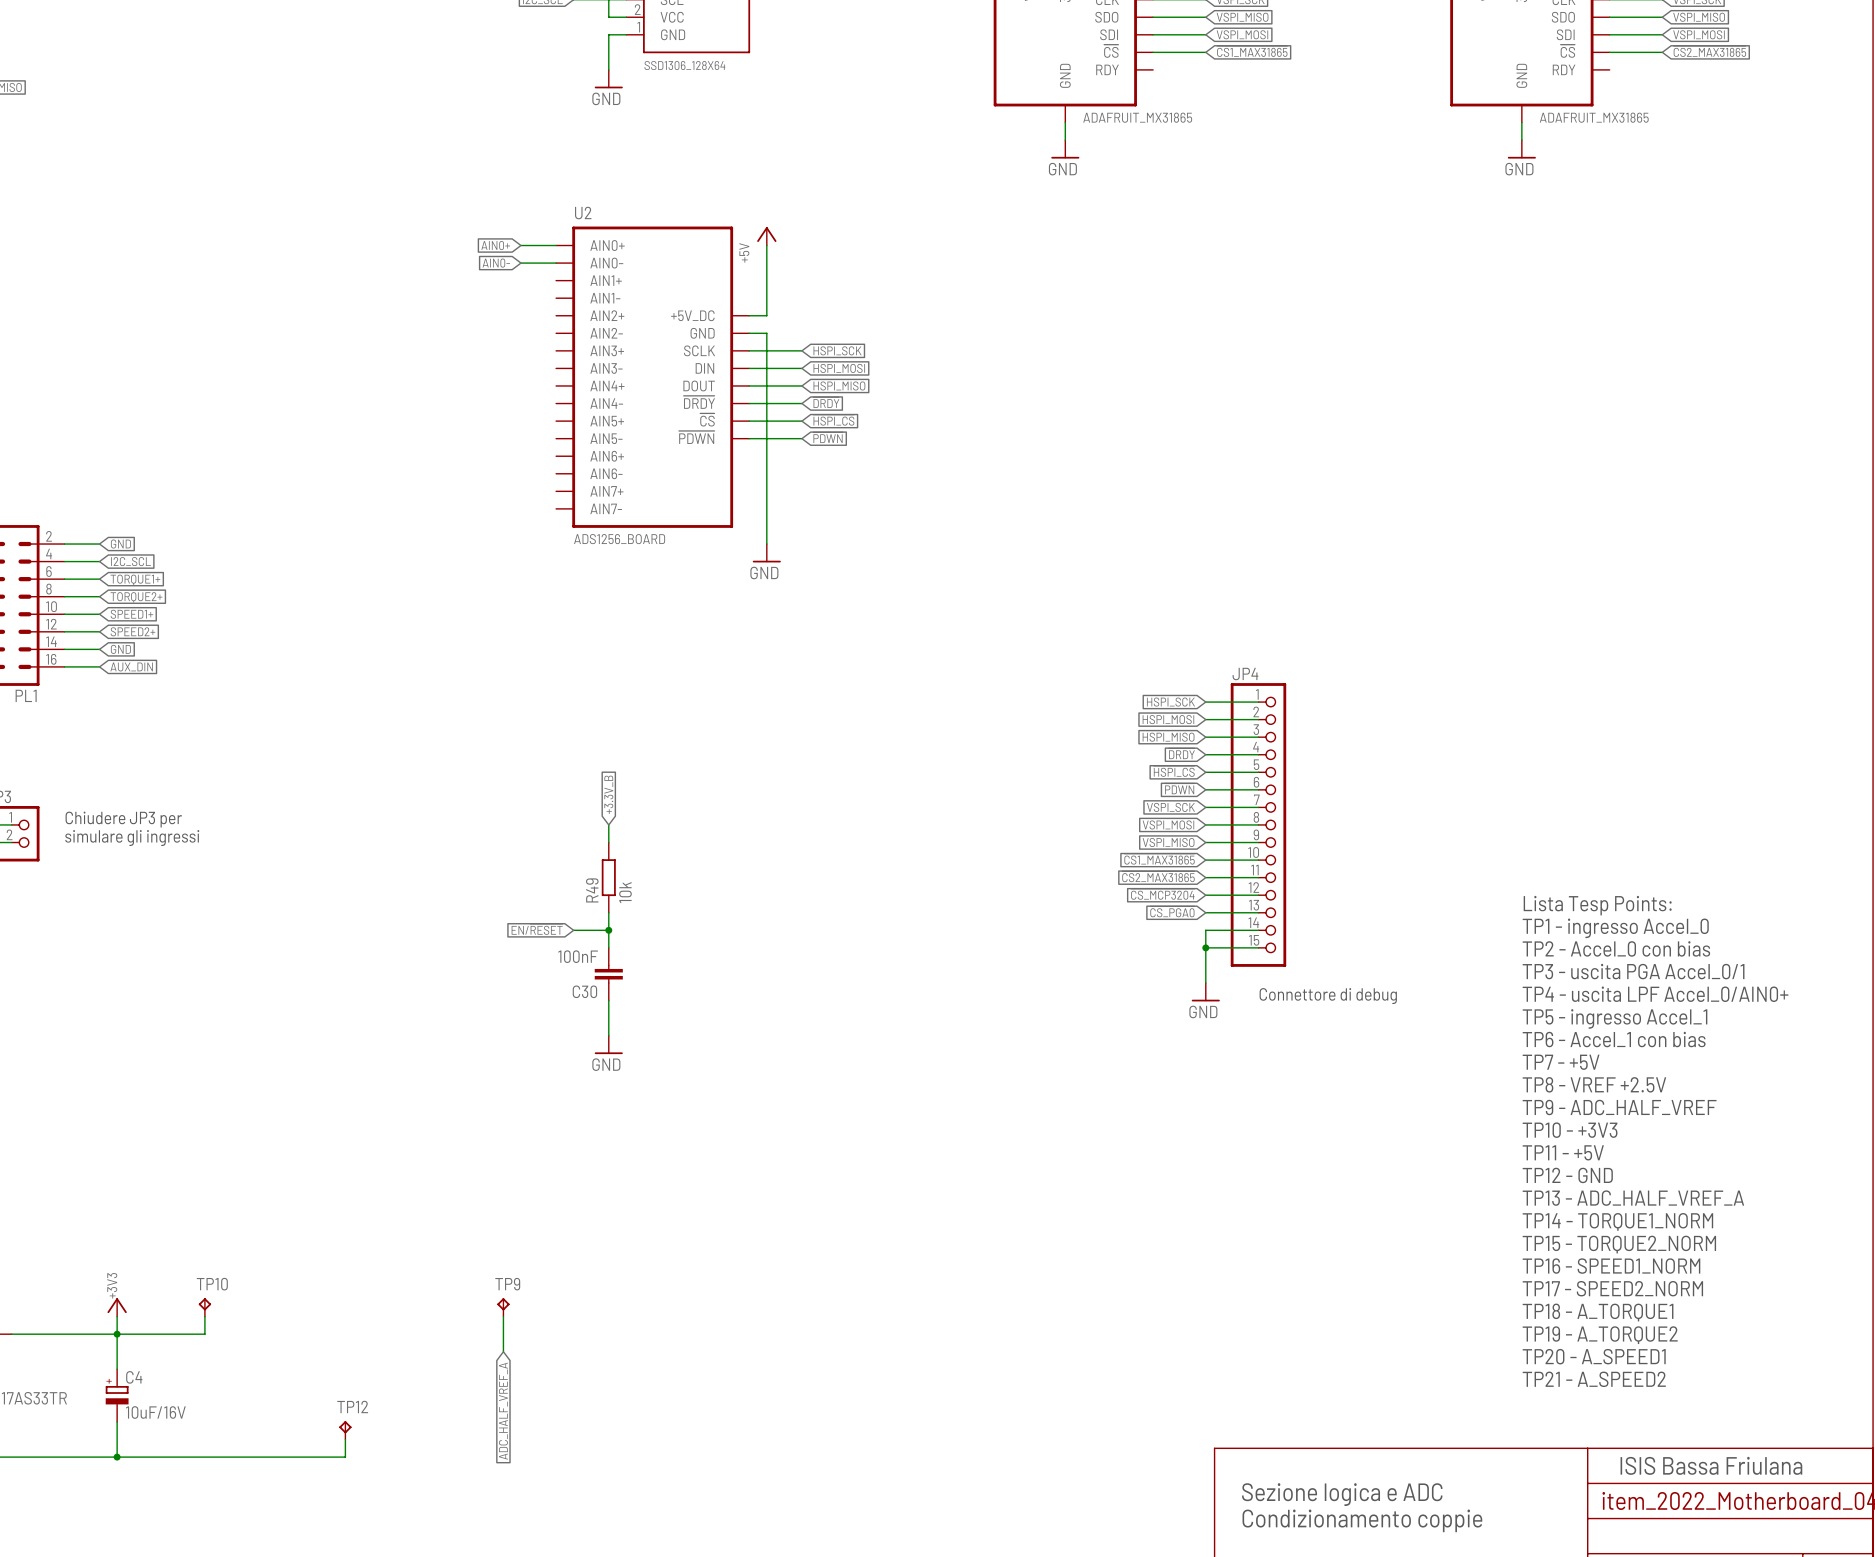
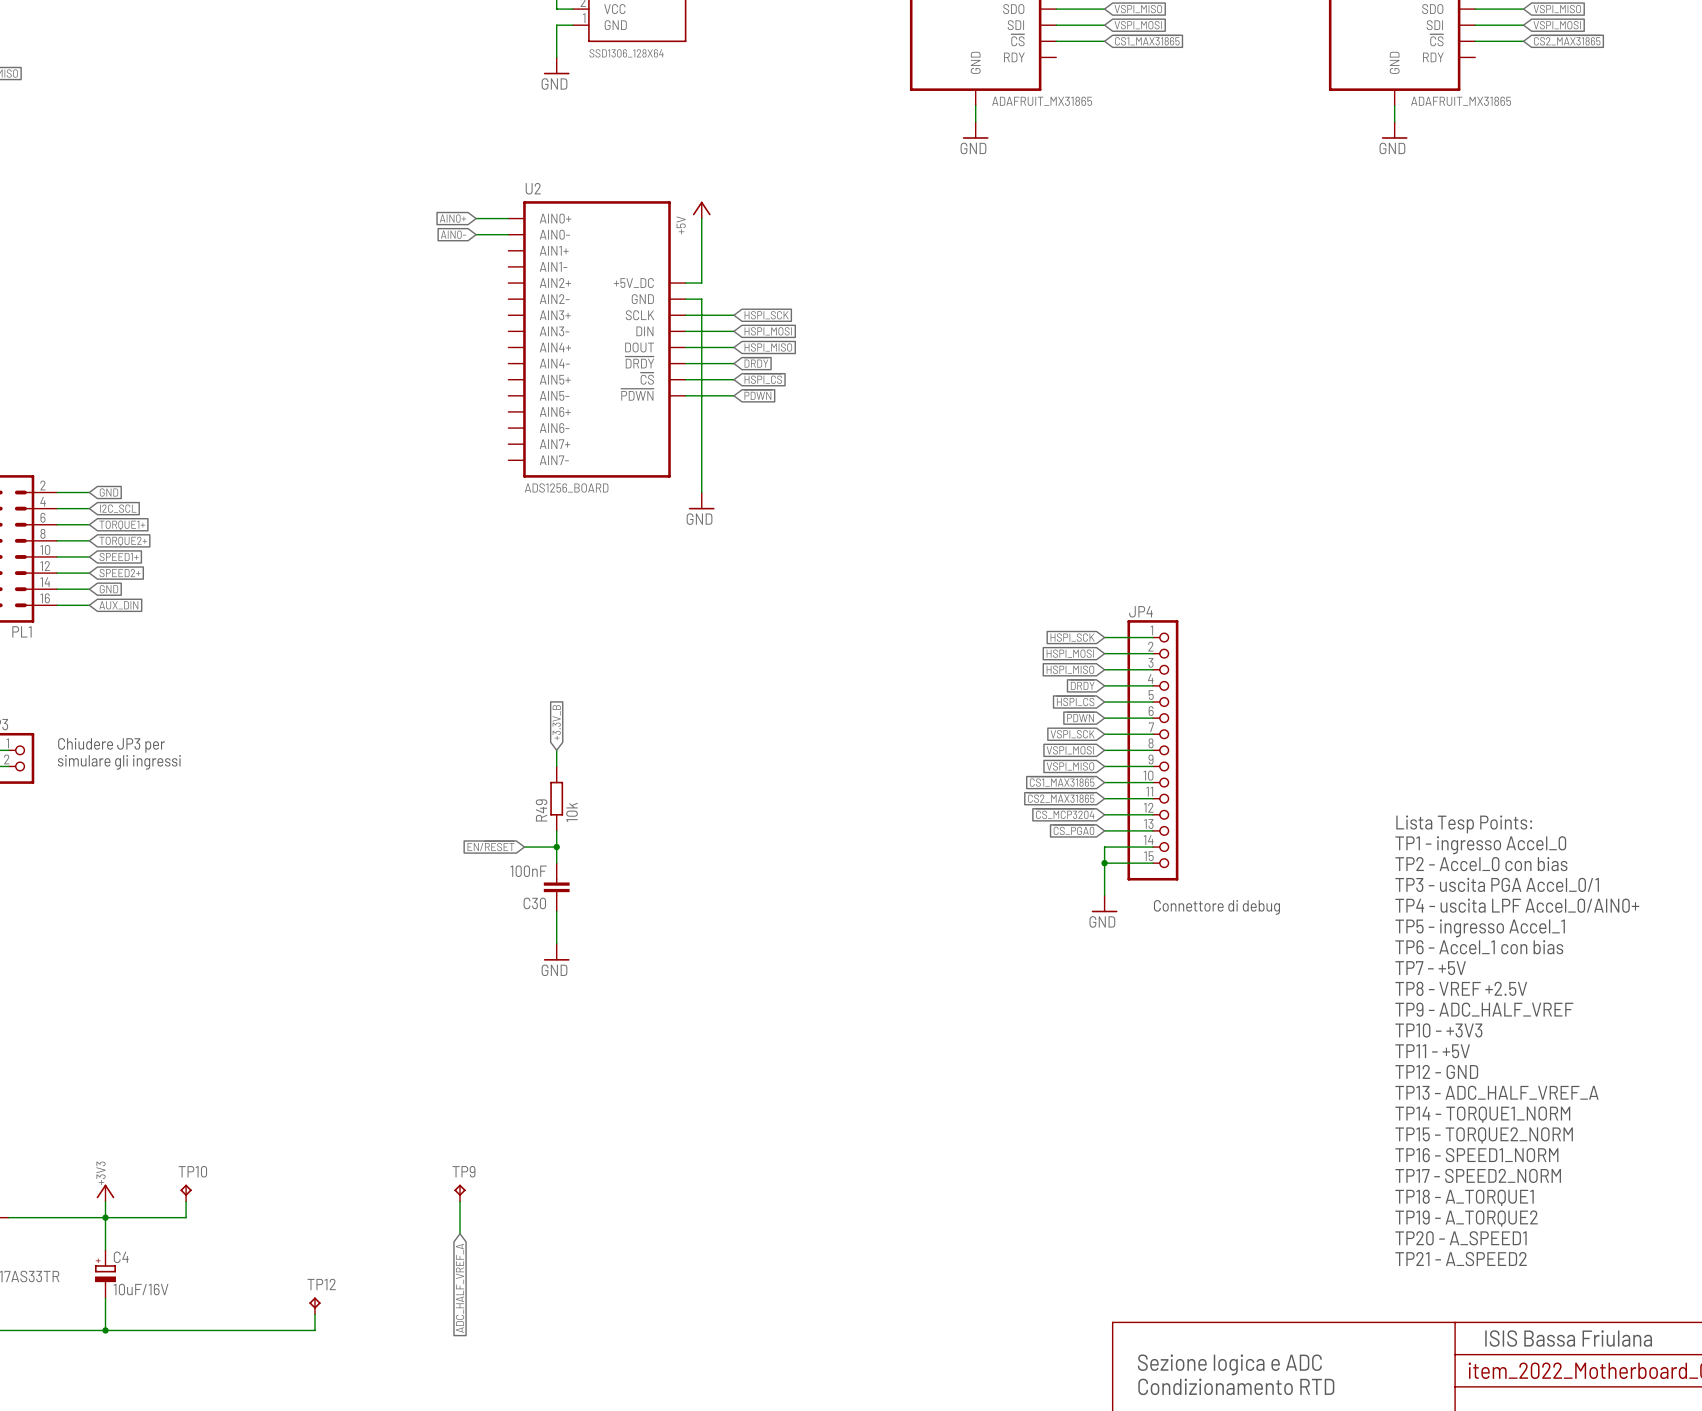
text: Condizionamento coppie (1362, 1520) -> Condizionamento RTD (1236, 1386)

